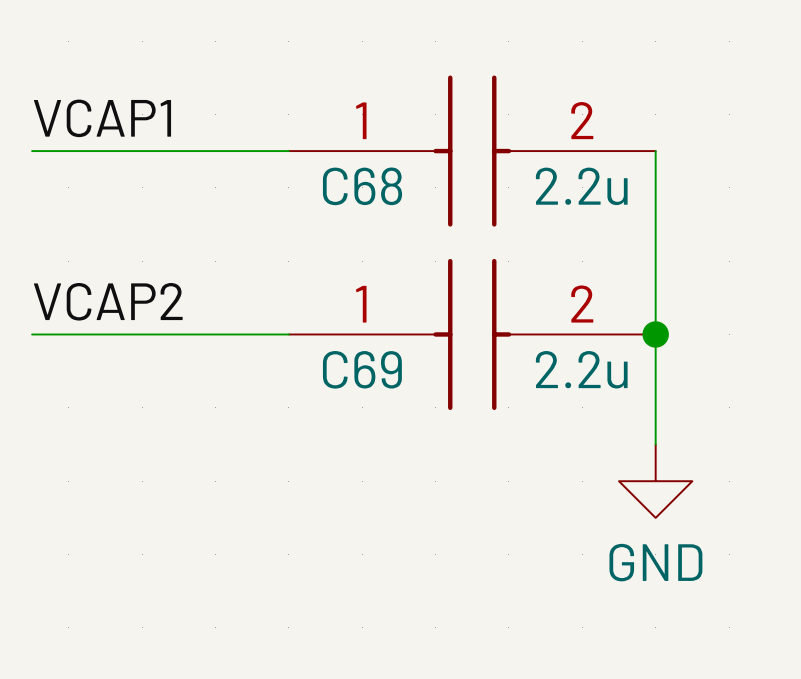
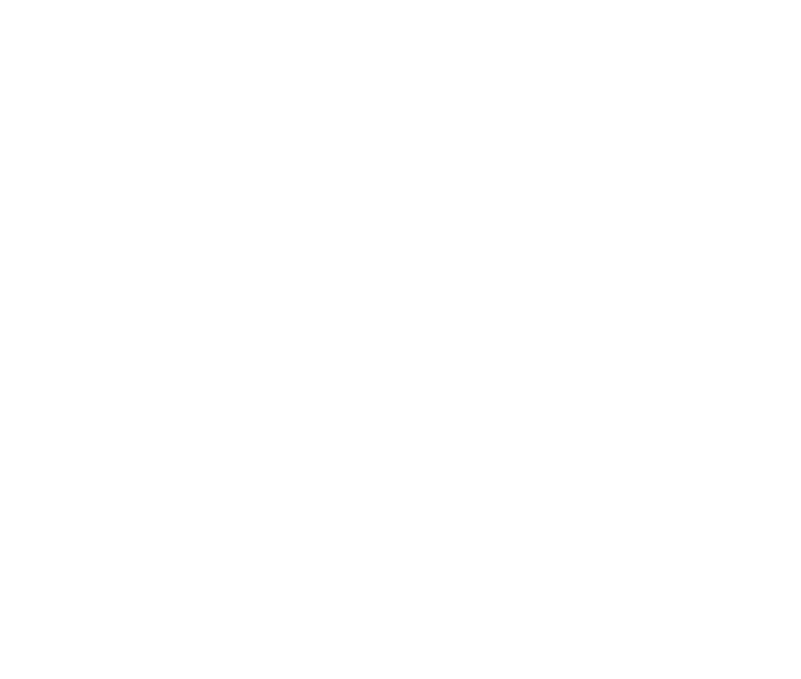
label: VCAP1 (102, 118) -> none
wire: (32, 151) (288, 151) -> none
C68: 2.2u (472, 151) -> none
wire: (655, 151) (655, 444) -> none
label: VCAP2 (108, 301) -> none
wire: (32, 334) (288, 334) -> none
C69: 2.2u (472, 334) -> none
junction: (655, 334) -> none
power symbol: GND (655, 481) -> none

